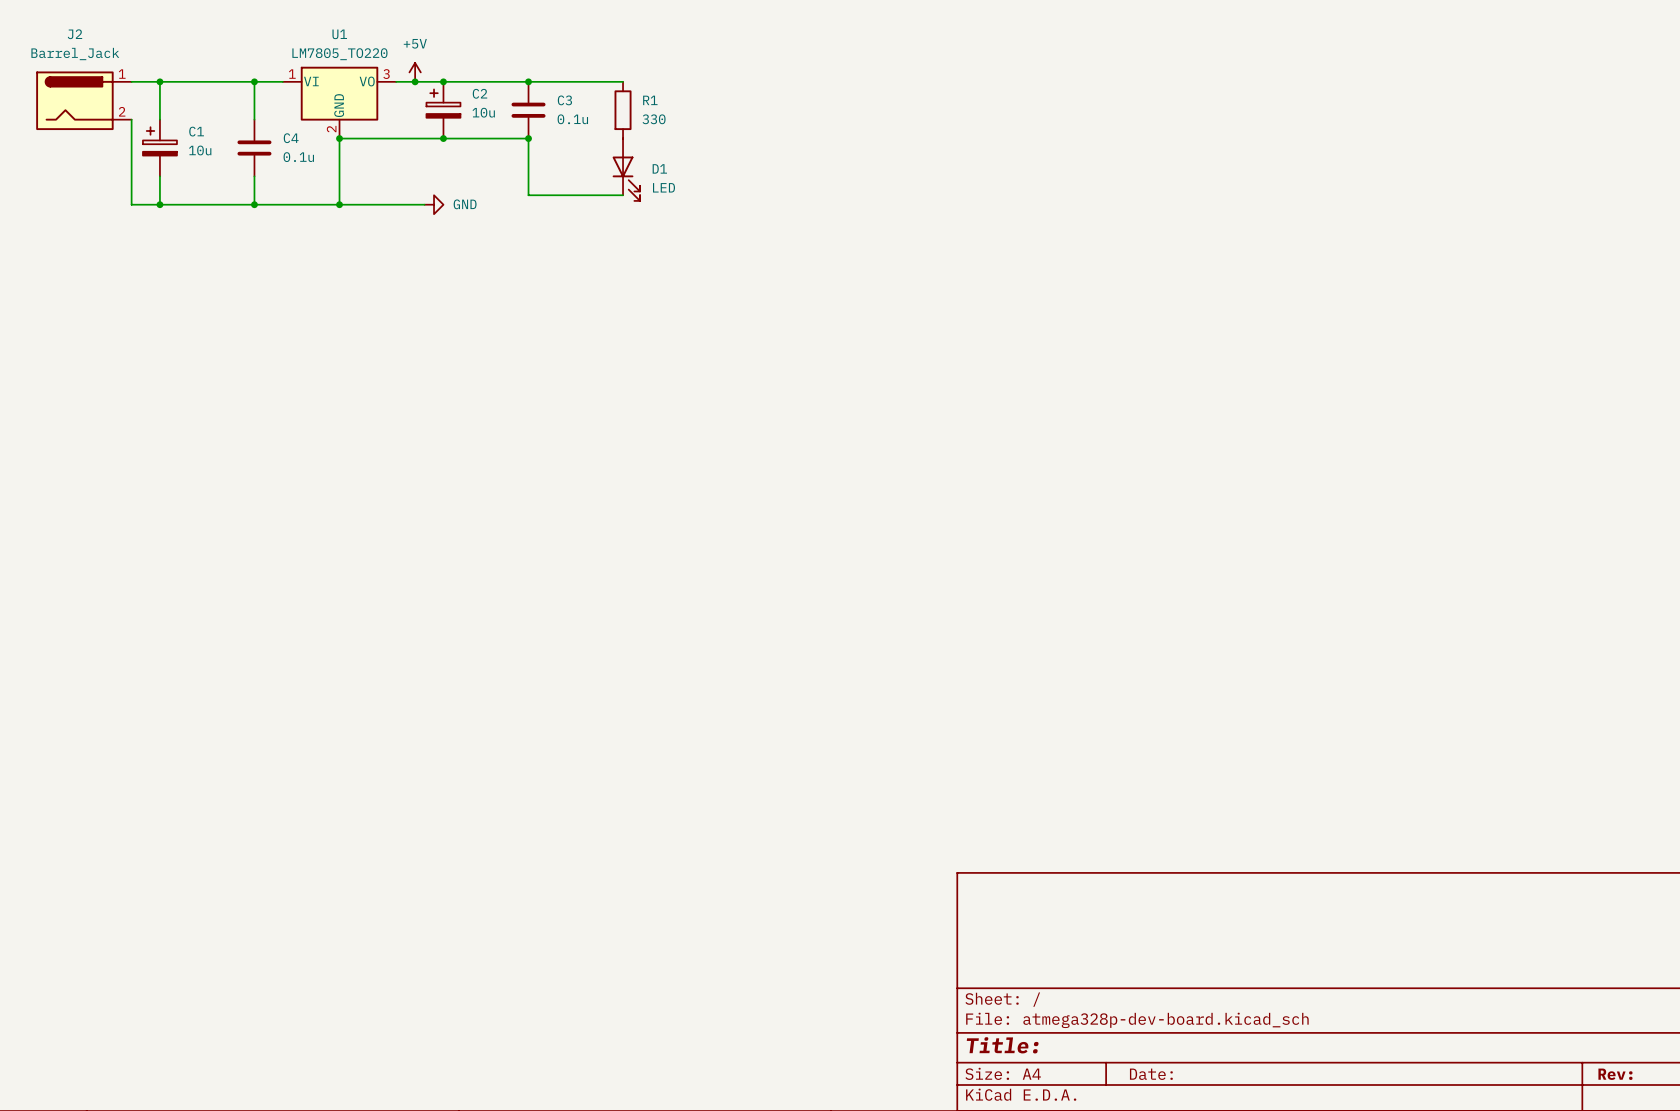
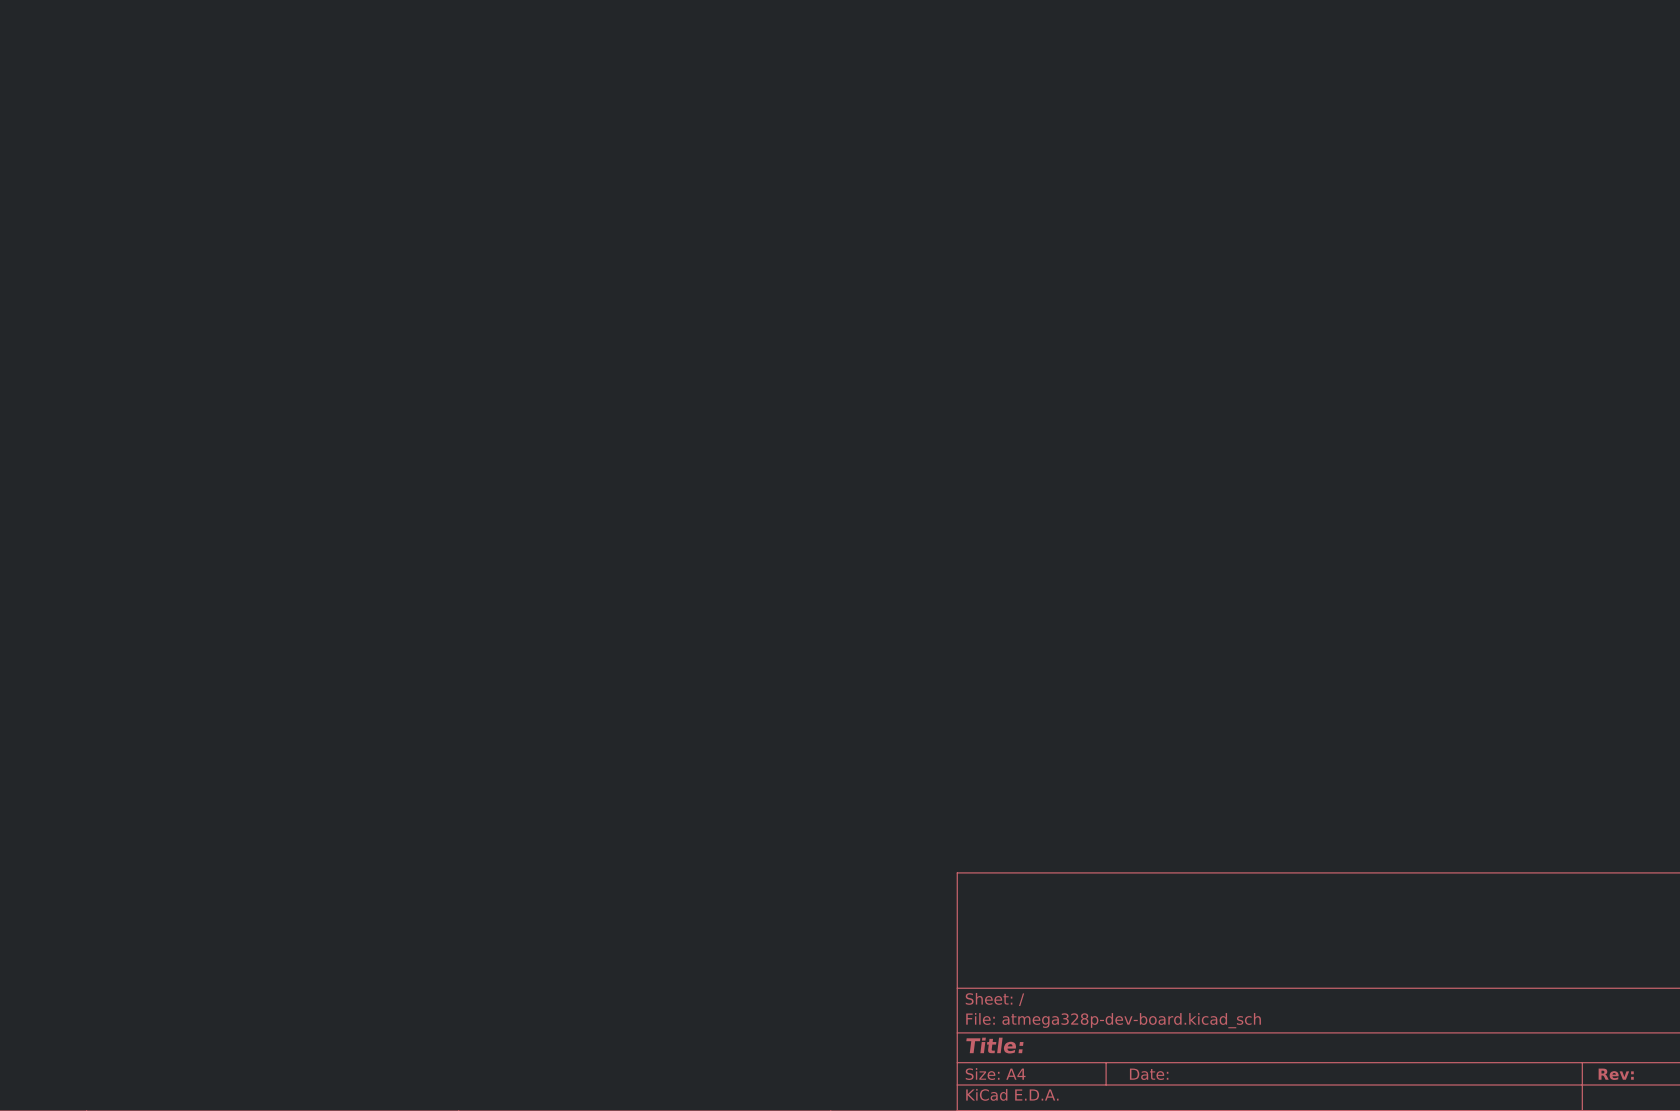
power symbol: +5V (415, 72) -> none
wire: (131, 81) (282, 81) -> none
wire: (159, 81) (159, 119) -> none
junction: (159, 81) -> none
wire: (254, 81) (254, 119) -> none
junction: (254, 81) -> none
wire: (396, 81) (623, 81) -> none
junction: (415, 81) -> none
junction: (443, 81) -> none
junction: (528, 81) -> none
J2: Barrel_Jack (83, 100) -> none
U1: LM7805_TO220 (339, 102) -> none
C2: 10u (443, 110) -> none
C3: 0.1u (528, 110) -> none
R1: 330 (623, 110) -> none
wire: (131, 119) (131, 204) (424, 204) -> none
junction: (339, 138) -> none
junction: (443, 138) -> none
junction: (528, 138) -> none
C1: 10u (159, 148) -> none
C4: 0.1u (254, 148) -> none
D1: LED (626, 169) -> none
wire: (159, 176) (159, 204) -> none
wire: (254, 176) (254, 204) -> none
wire: (623, 195) (528, 195) (528, 138) (339, 138) (339, 204) -> none
junction: (159, 204) -> none
junction: (254, 204) -> none
junction: (339, 204) -> none
power symbol: GND (434, 204) -> none

